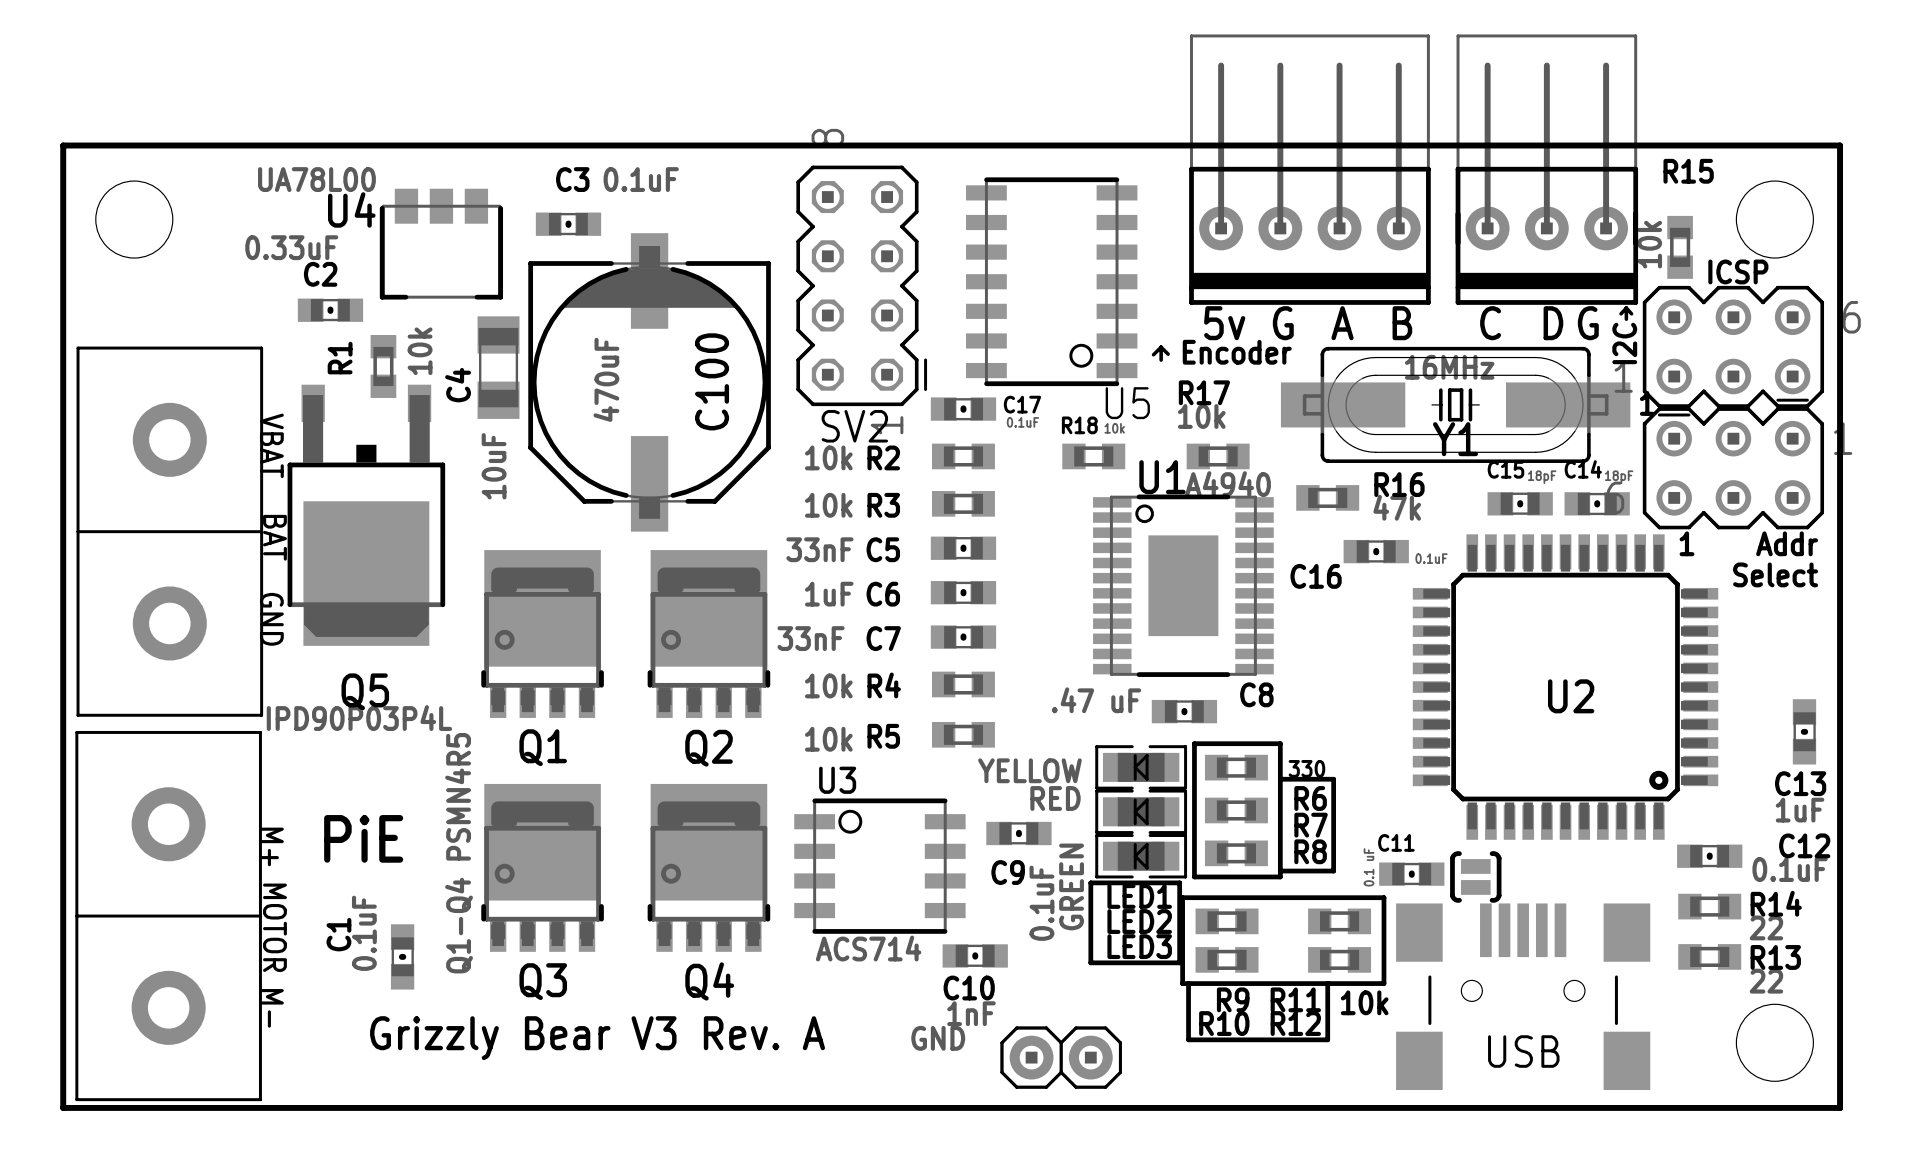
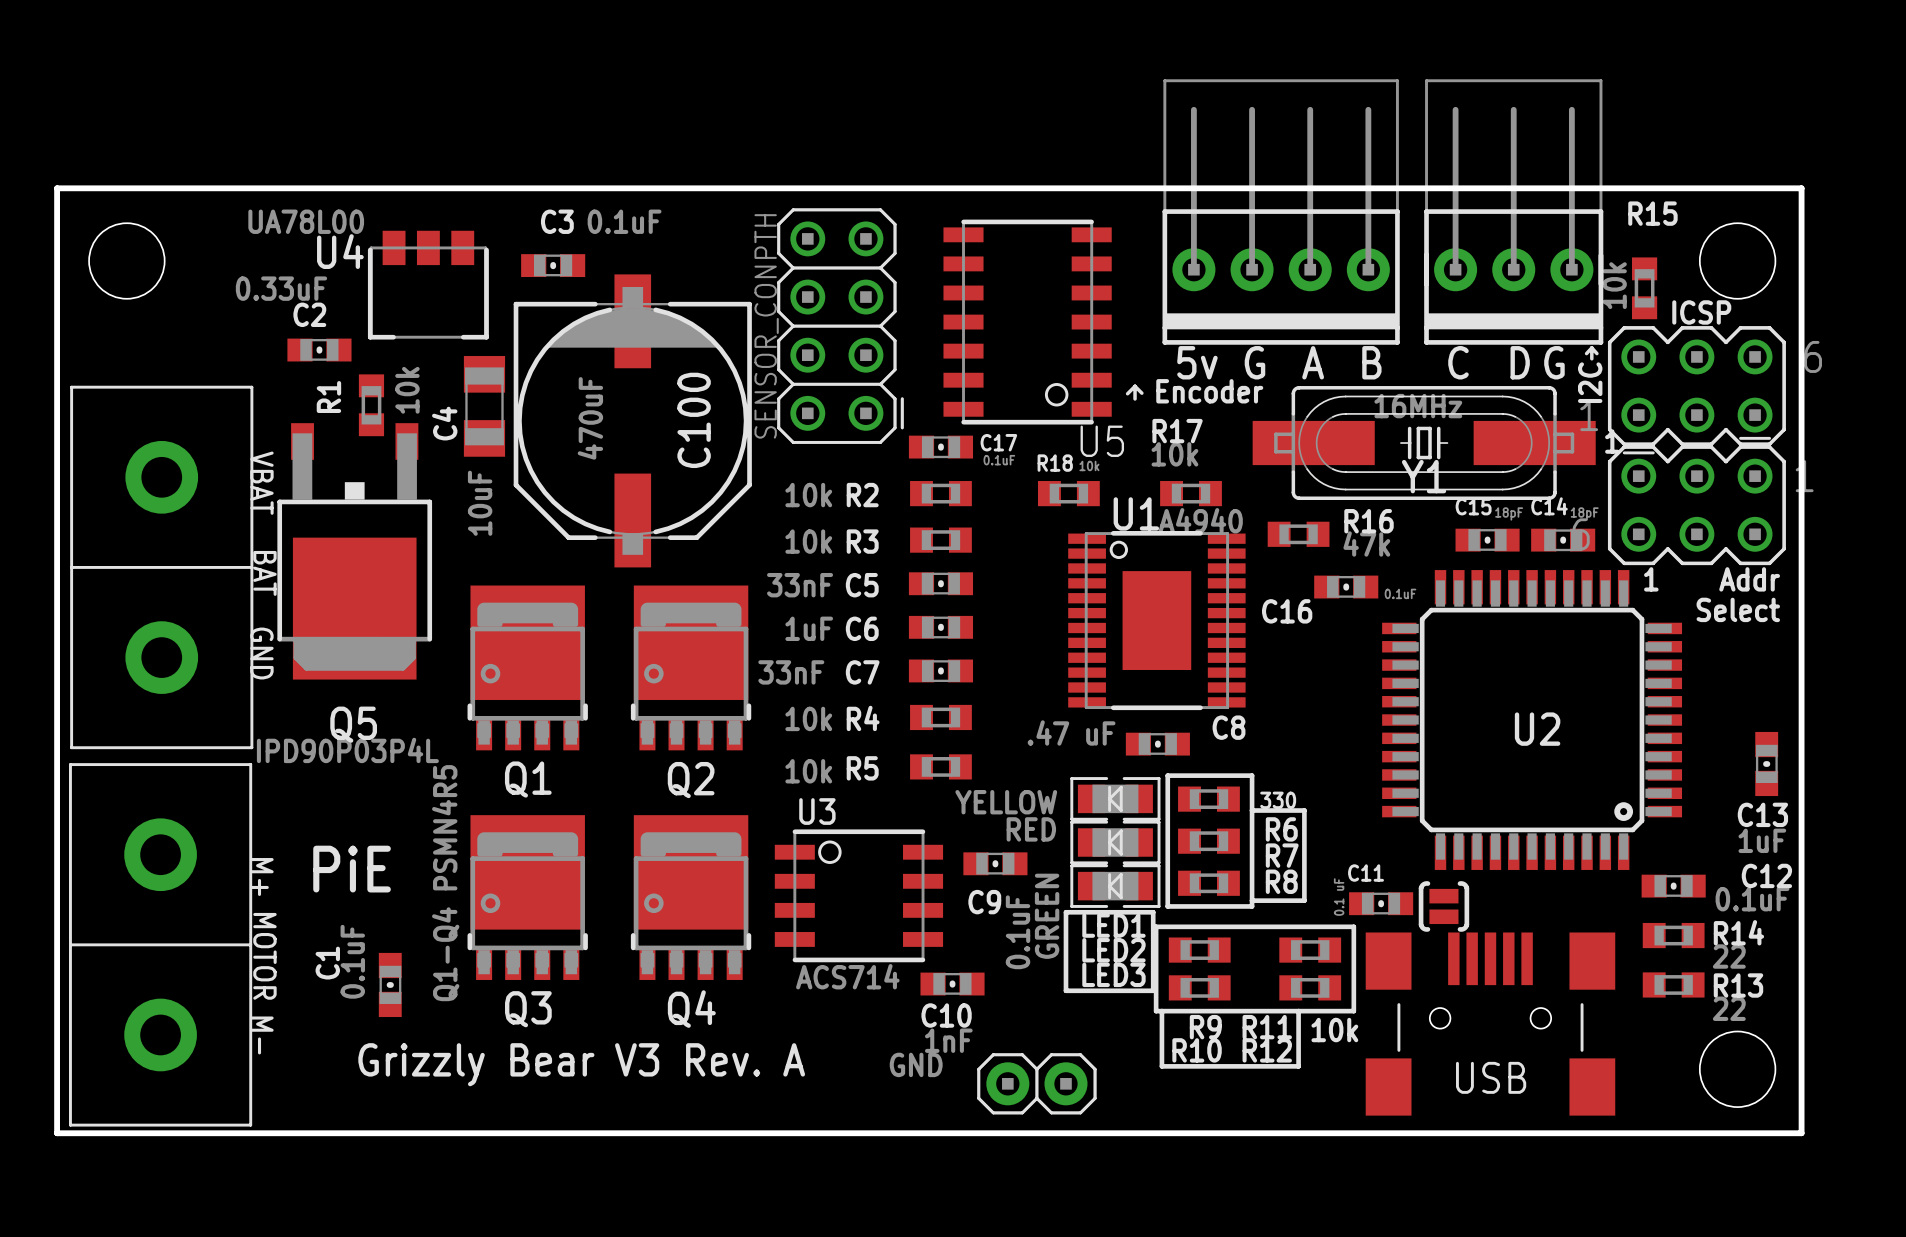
SV2: (861, 285) -> none
part: none -> SENSOR_CONPTH (840, 326)

